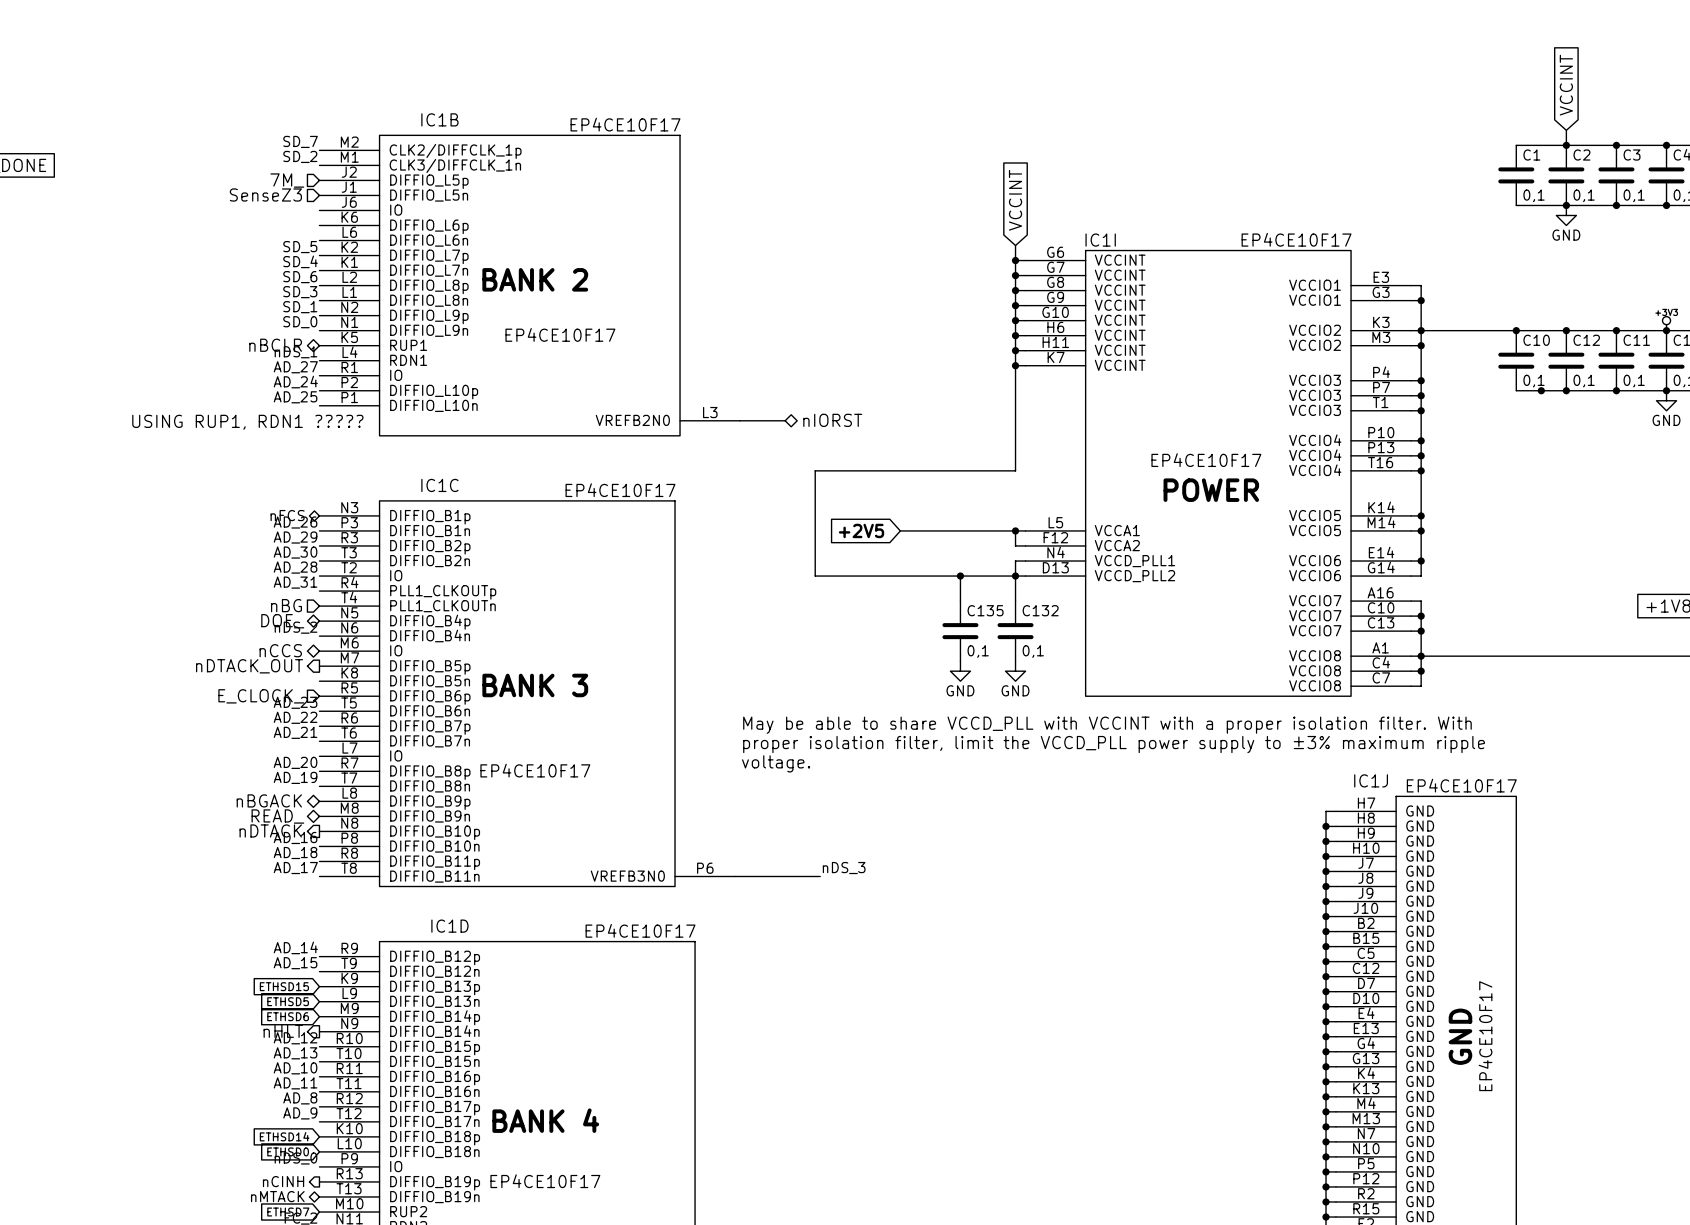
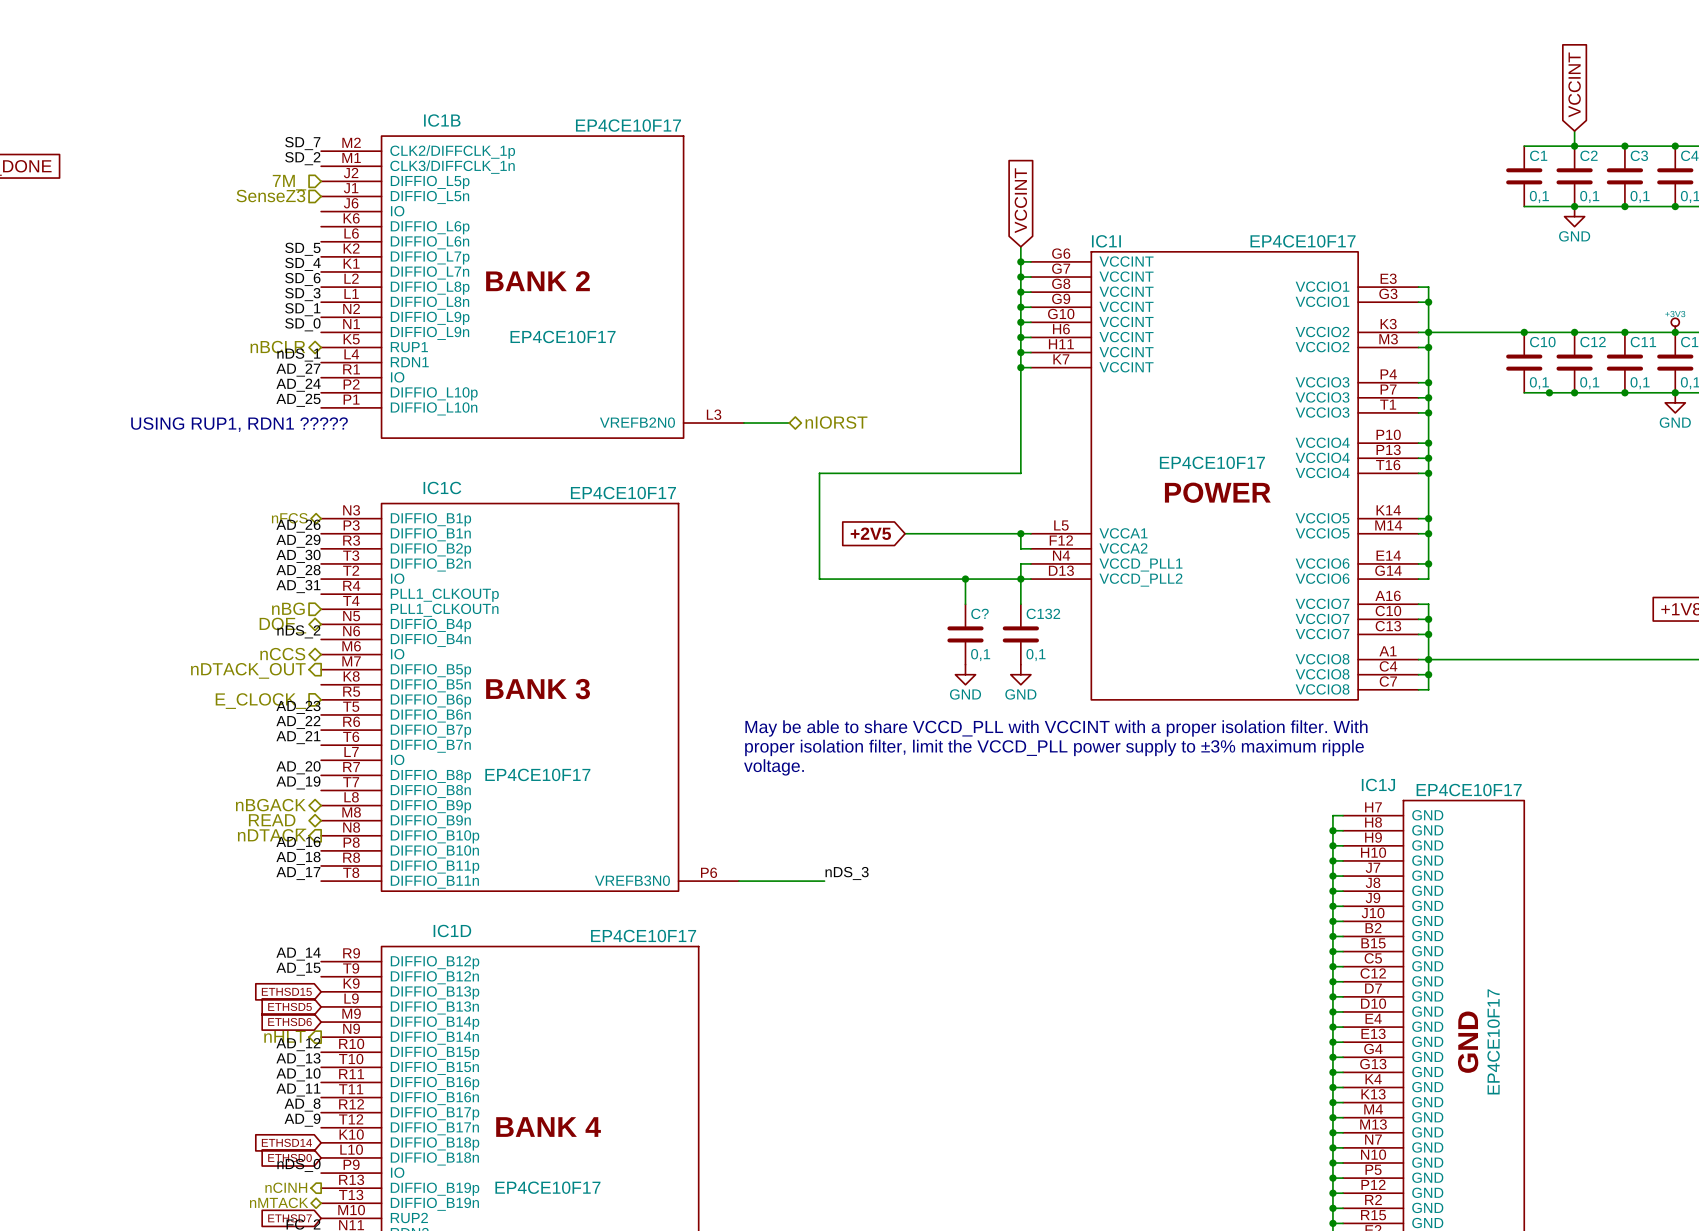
C135 name: C135 (985, 610) -> C? (979, 613)

